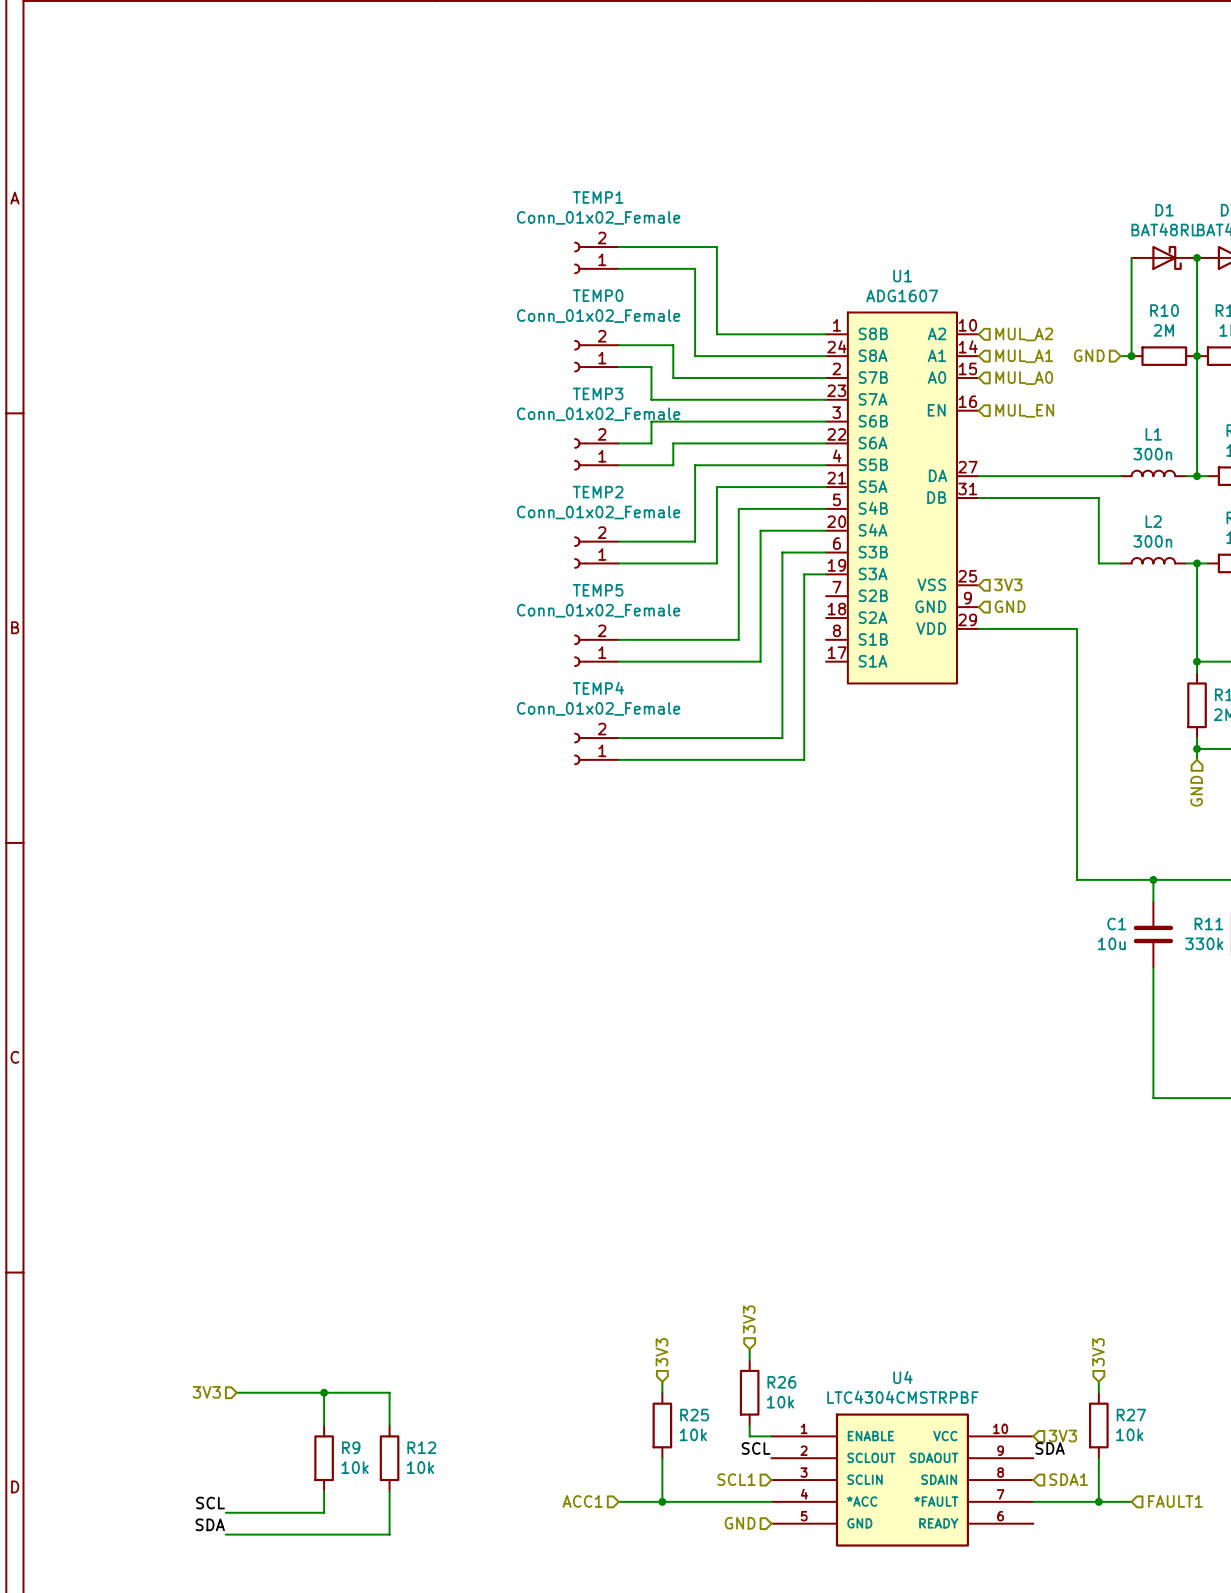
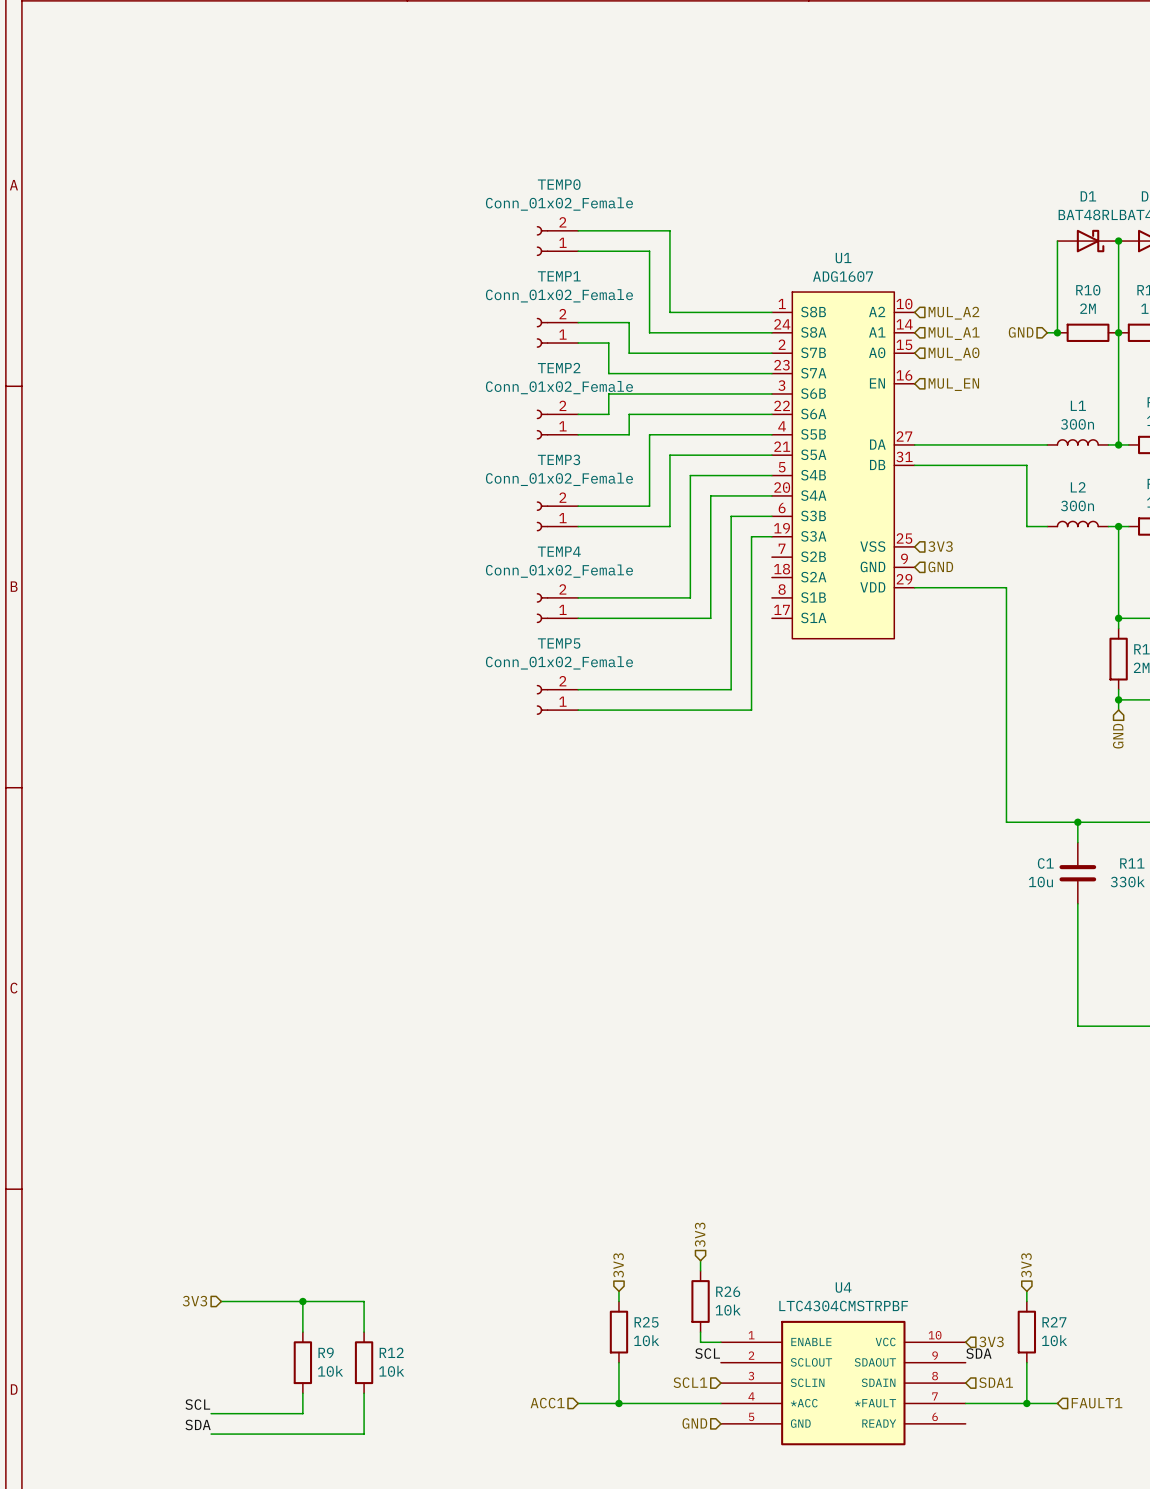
TEMP1 name: TEMP1 (598, 197) -> TEMP0 (559, 184)
TEMP0 name: TEMP0 (598, 295) -> TEMP1 (559, 276)
TEMP3 name: TEMP3 (598, 393) -> TEMP2 (559, 368)
TEMP2 name: TEMP2 (598, 492) -> TEMP3 (559, 459)
TEMP5 name: TEMP5 (598, 590) -> TEMP4 (559, 551)
TEMP4 name: TEMP4 (598, 688) -> TEMP5 (559, 643)

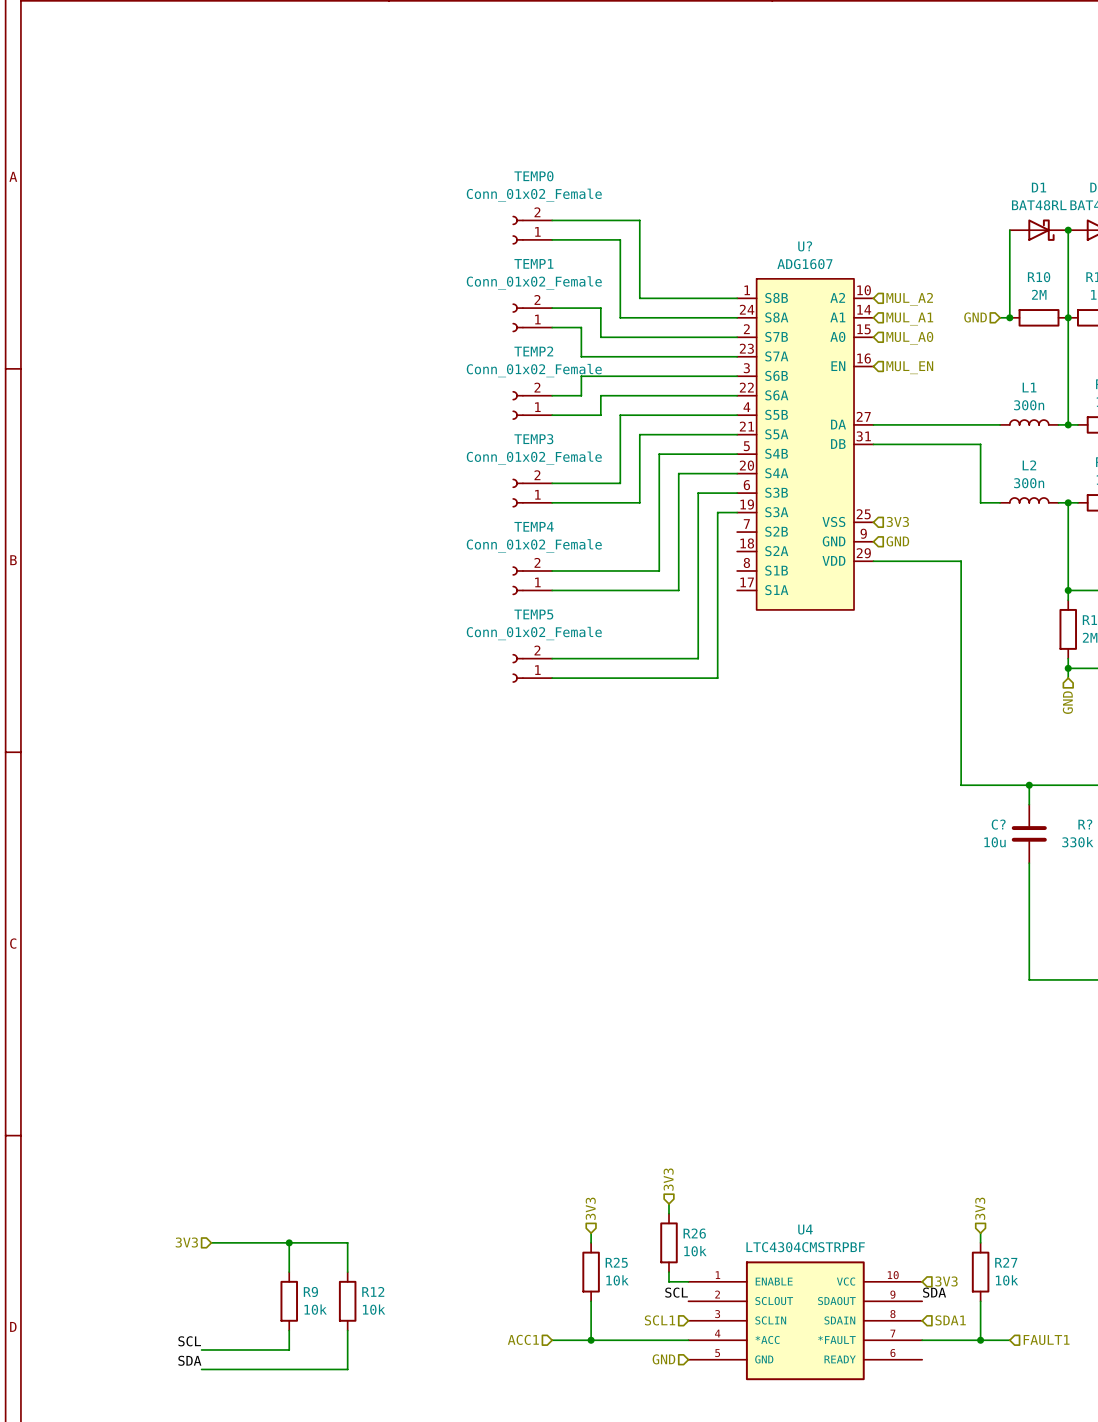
U1 name: U1 (843, 258) -> U? (805, 246)
C1 name: C1 (1045, 863) -> C? (998, 824)
R11 name: R11 (1132, 863) -> R? (1085, 824)

